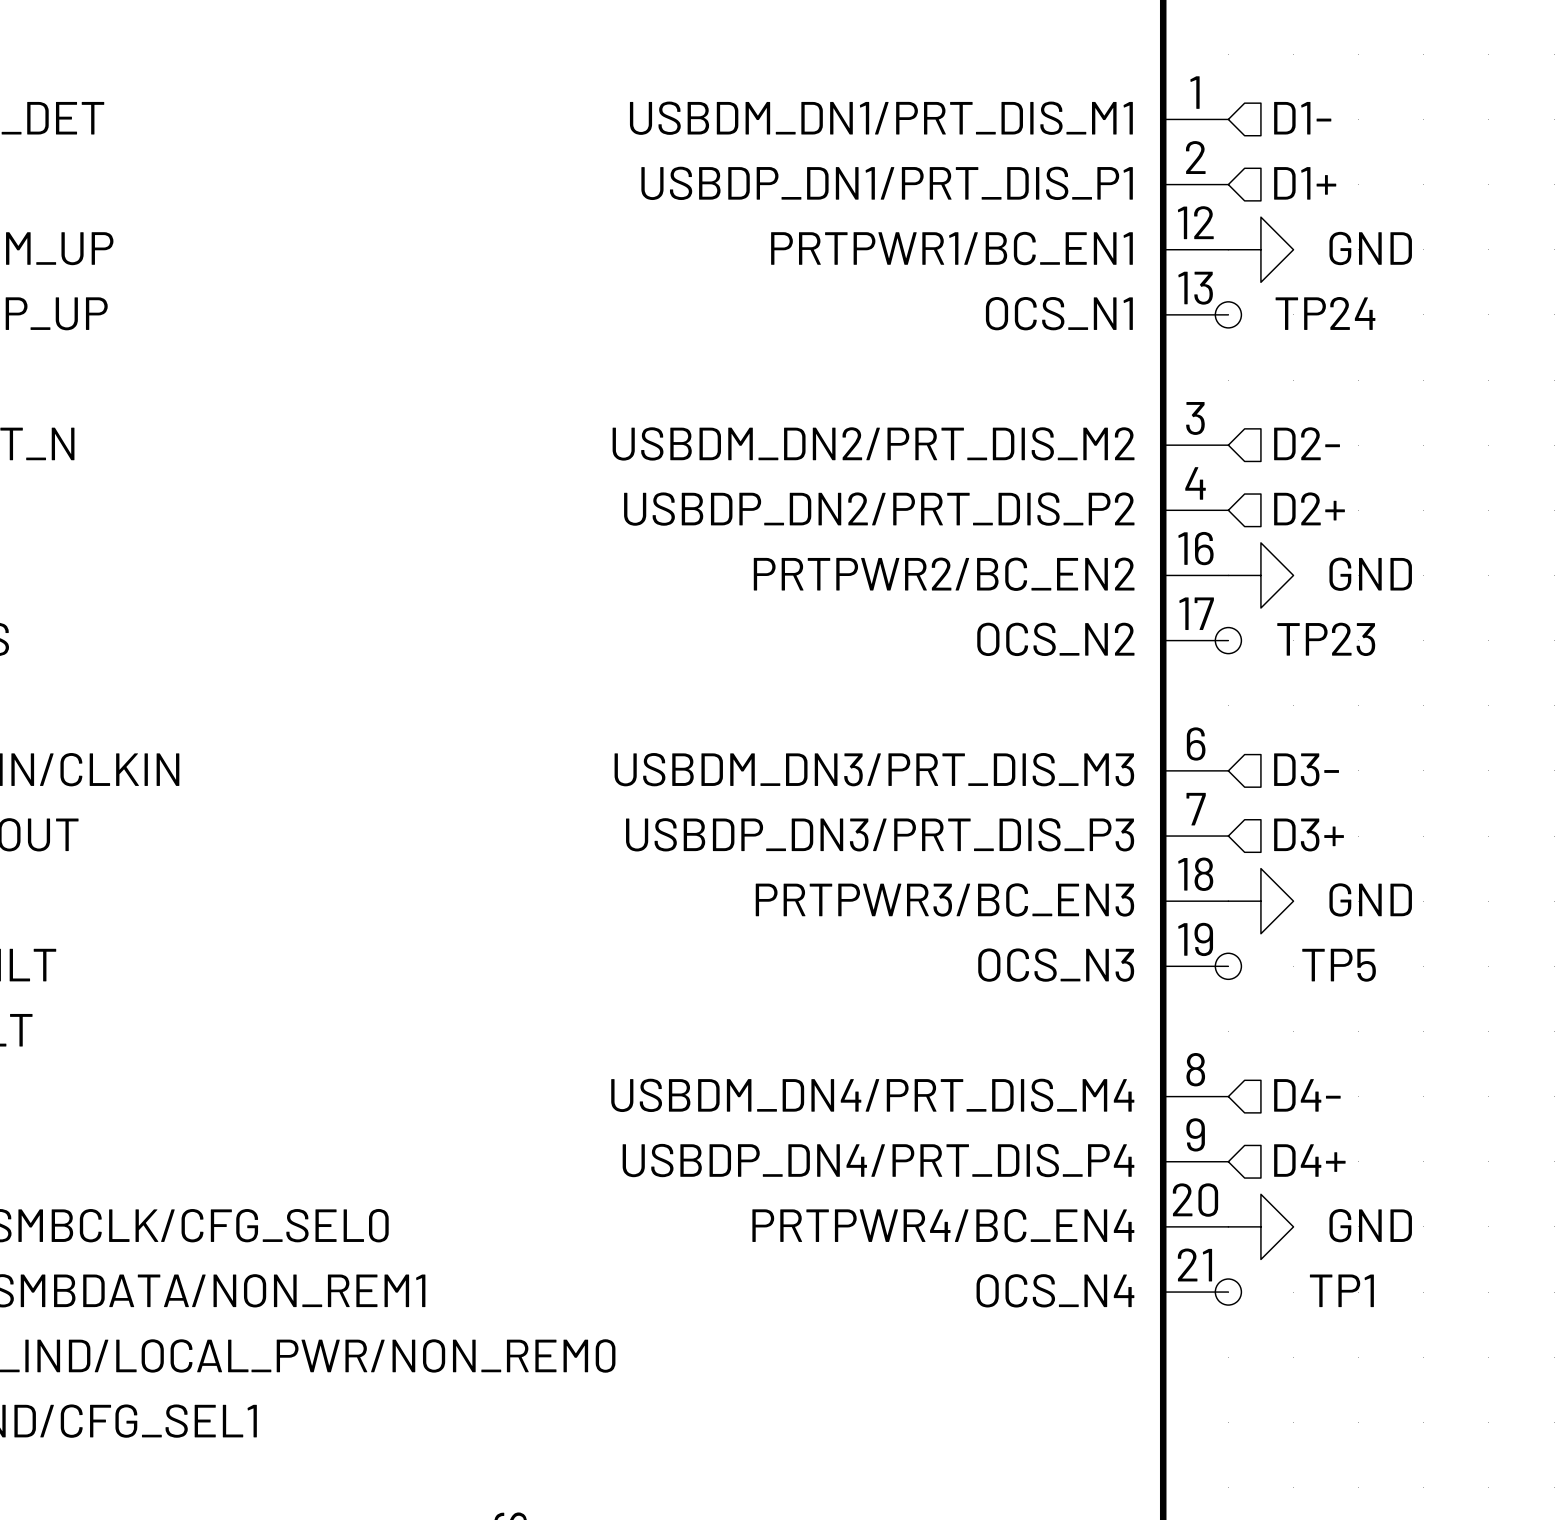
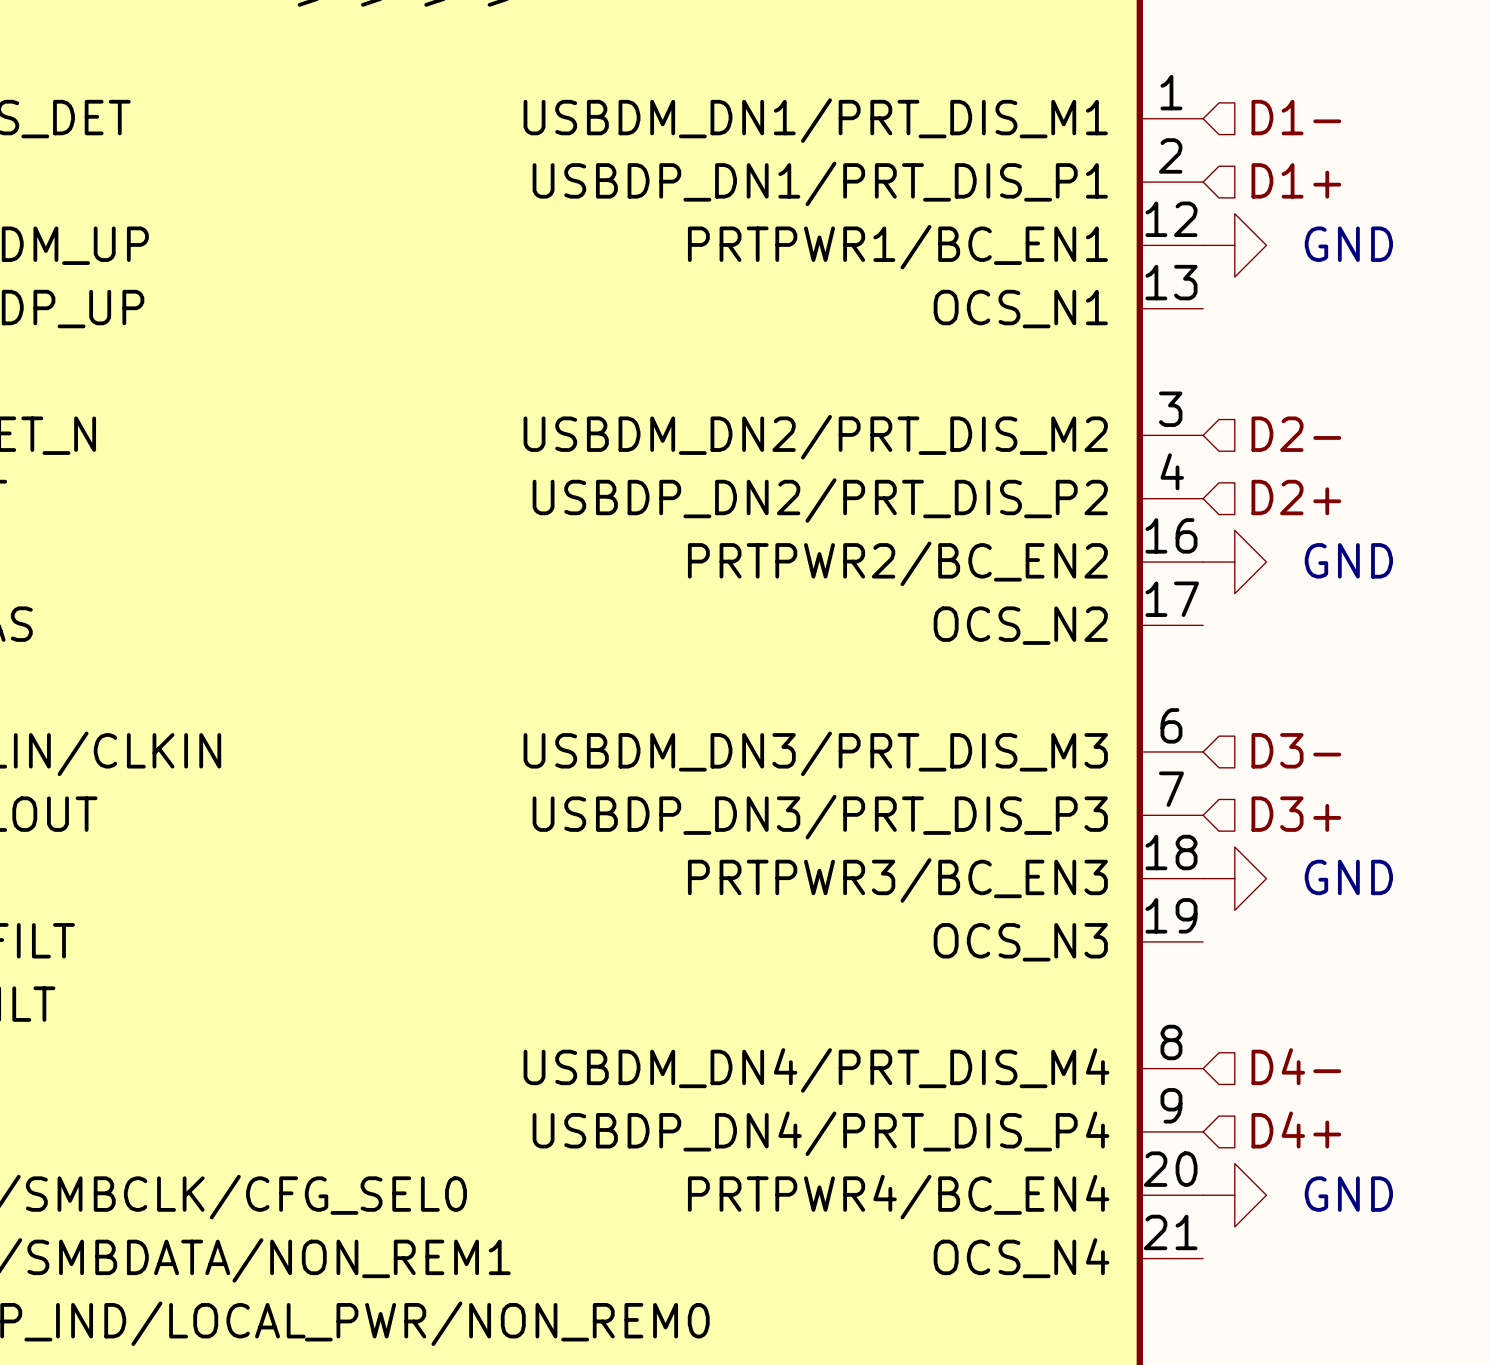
TP24: (1228, 314) -> none
TP23: (1228, 640) -> none
TP5: (1228, 966) -> none
TP1: (1228, 1292) -> none

